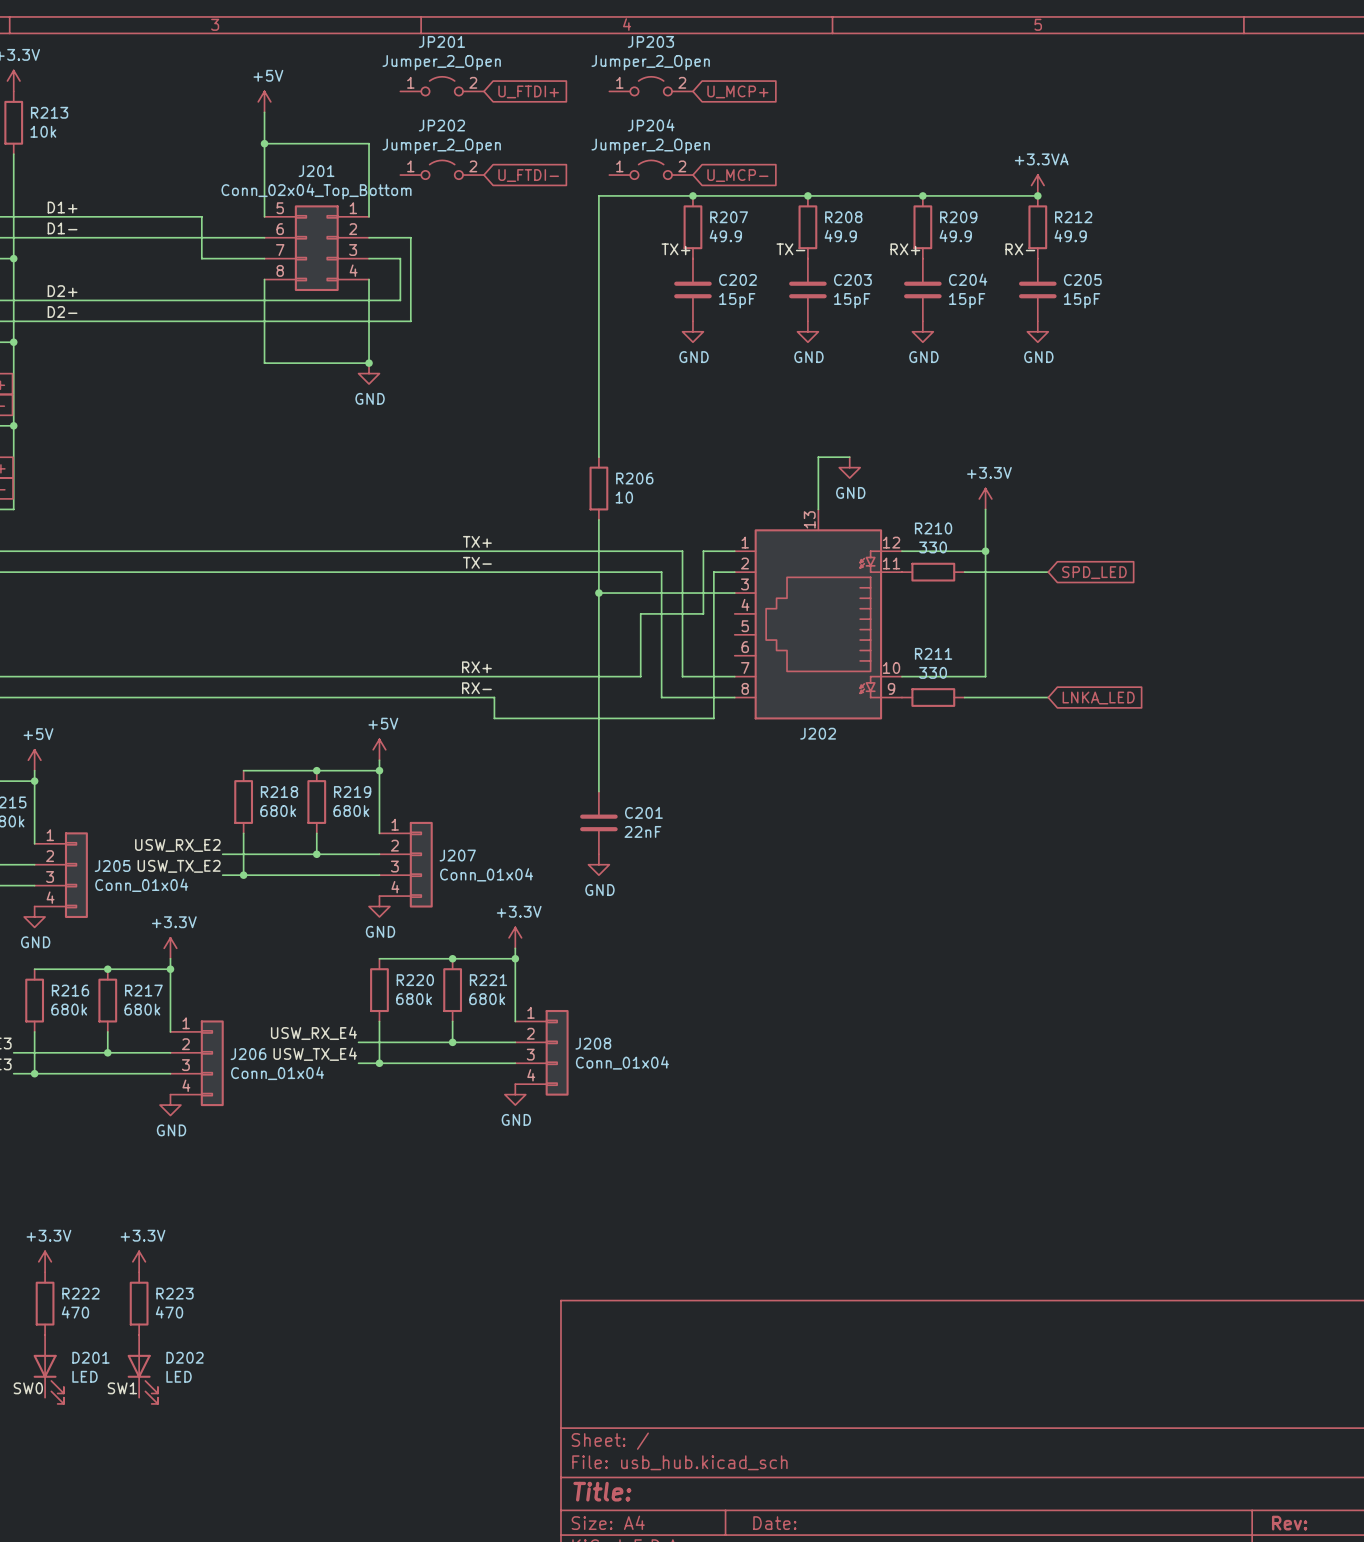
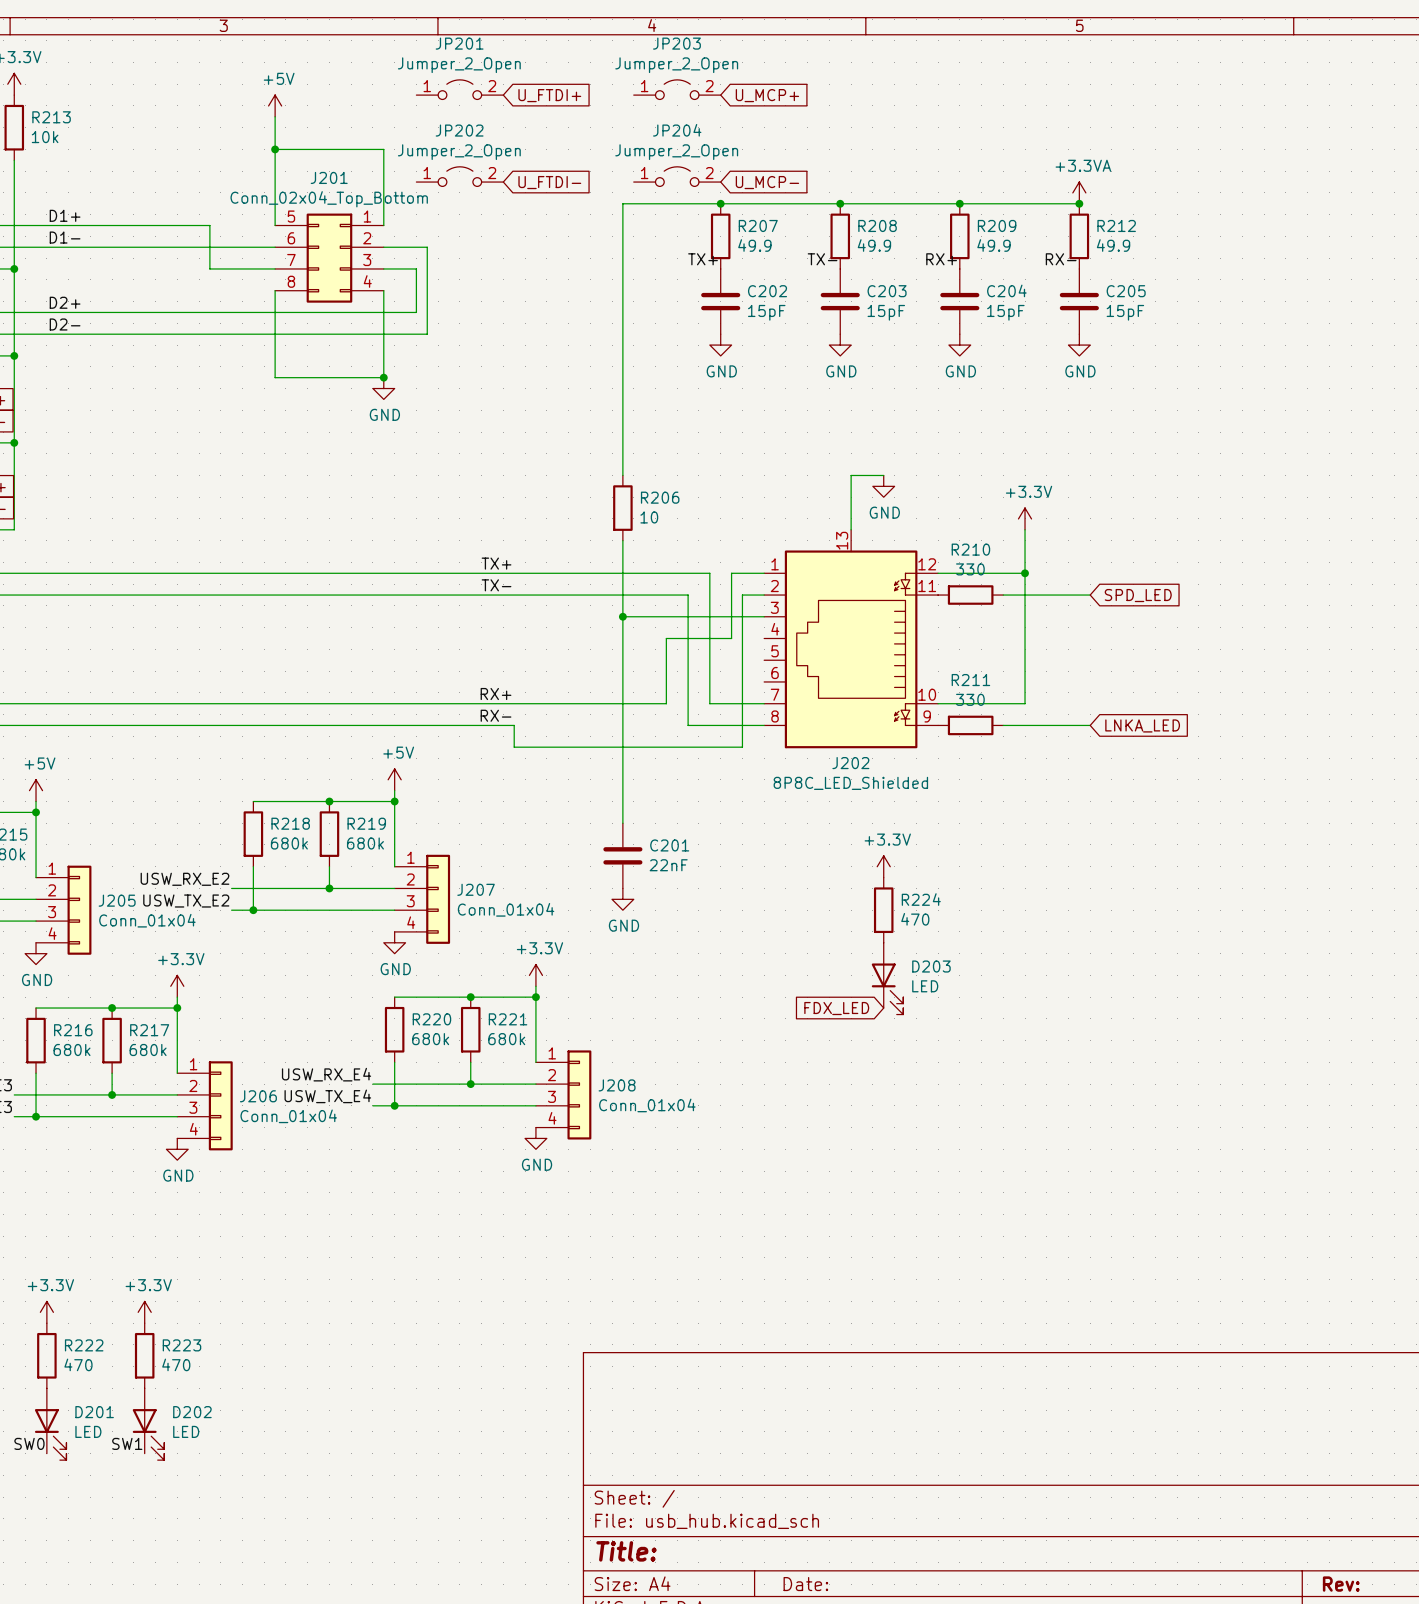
J202 value: none -> 8P8C_LED_Shielded (850, 783)
power symbol: none -> +3.3V (883, 866)
R224: none -> 470 (883, 910)
D203: none -> LED (887, 978)
global label: none -> FDX_LED (836, 1008)

